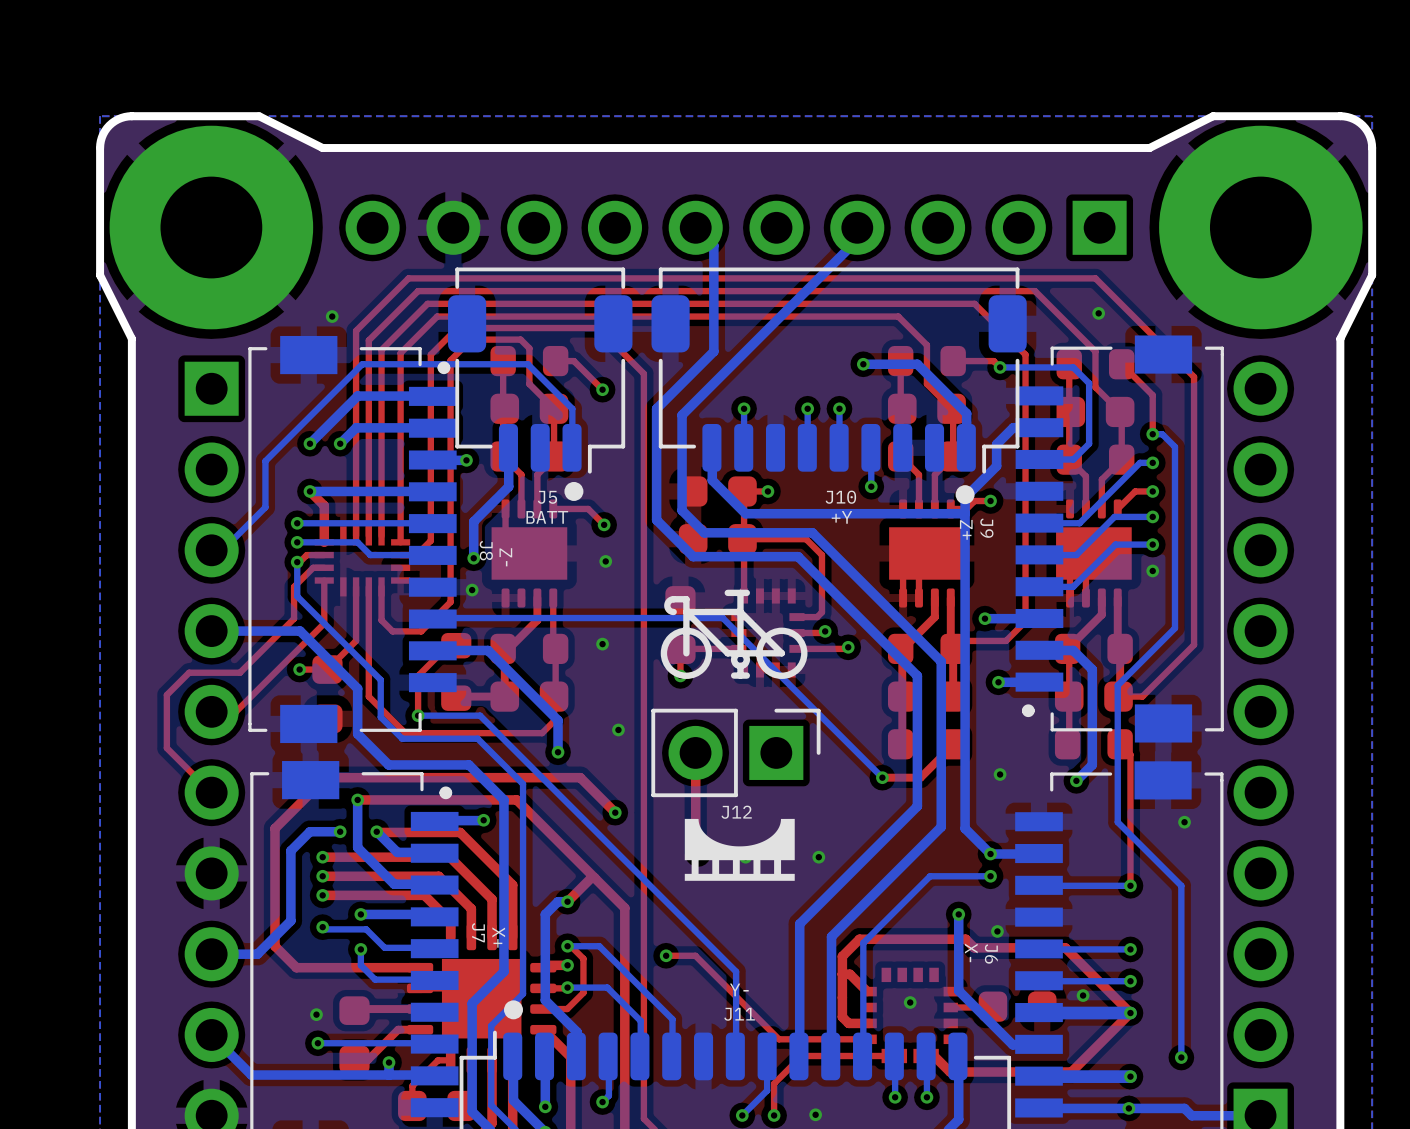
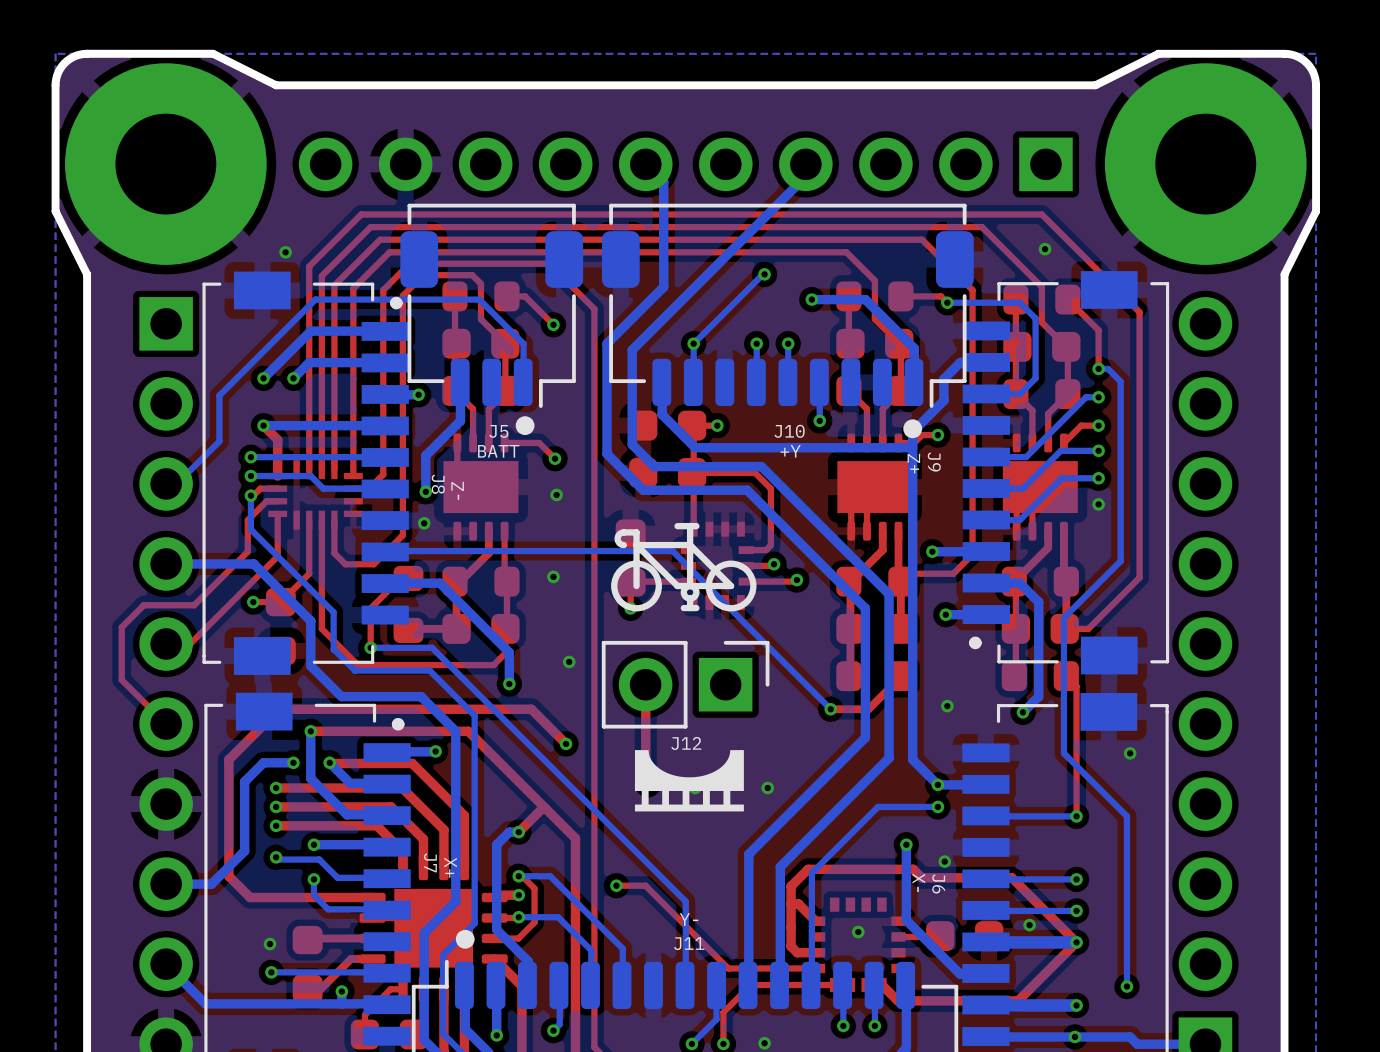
bottom track: none -> (764, 274) (693, 343)
via: none -> (764, 274)

